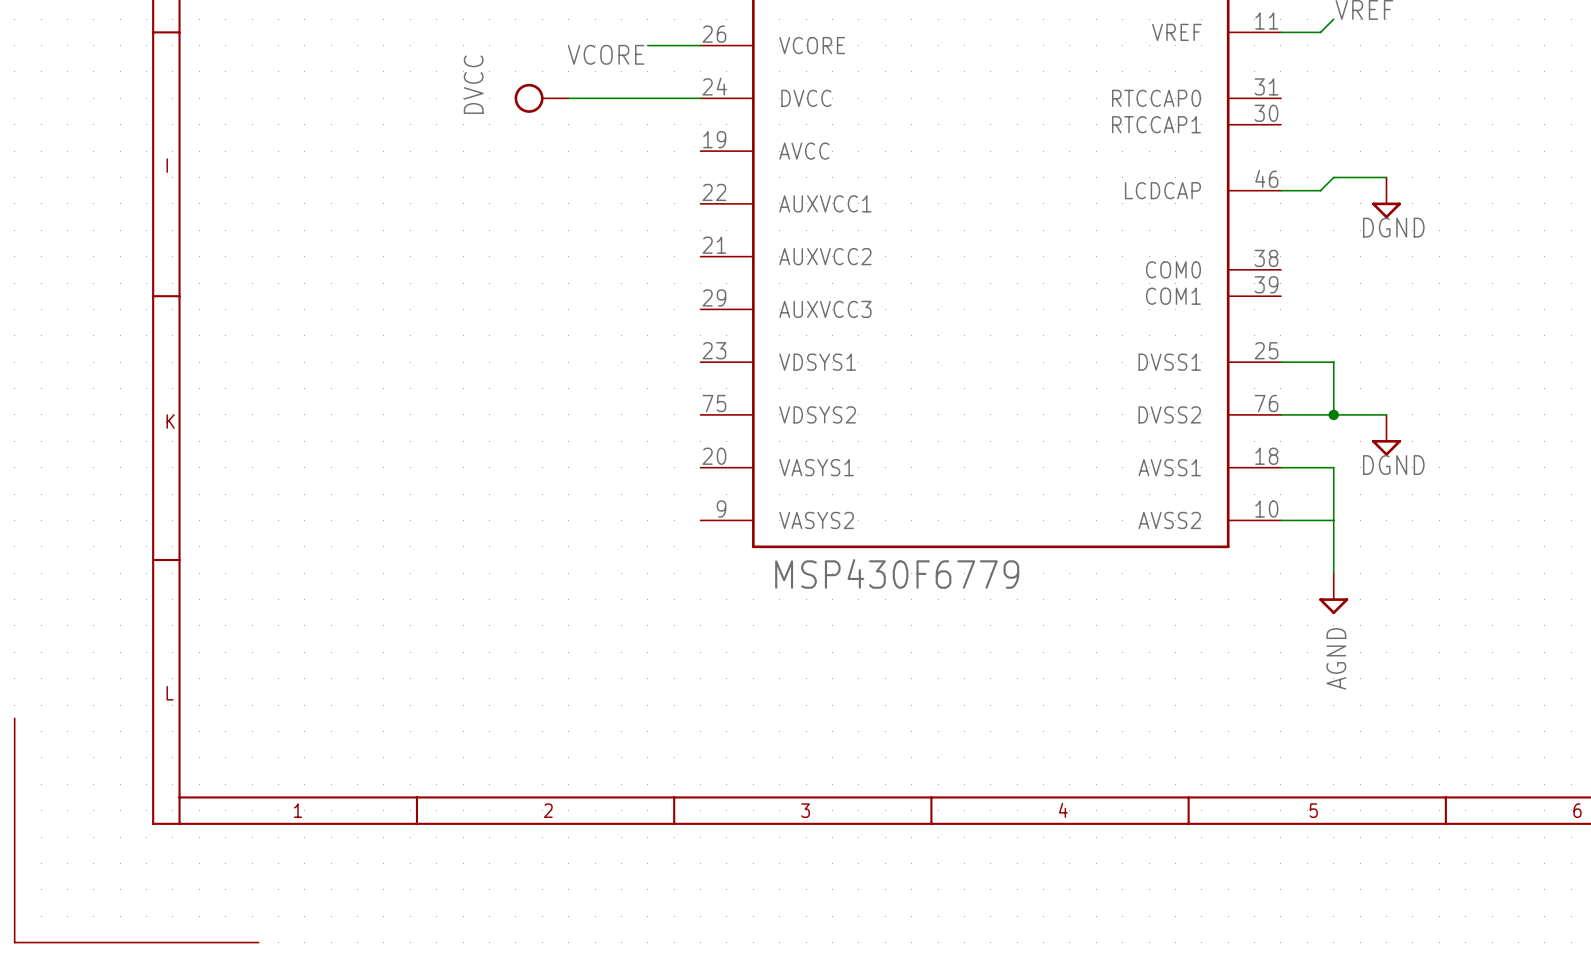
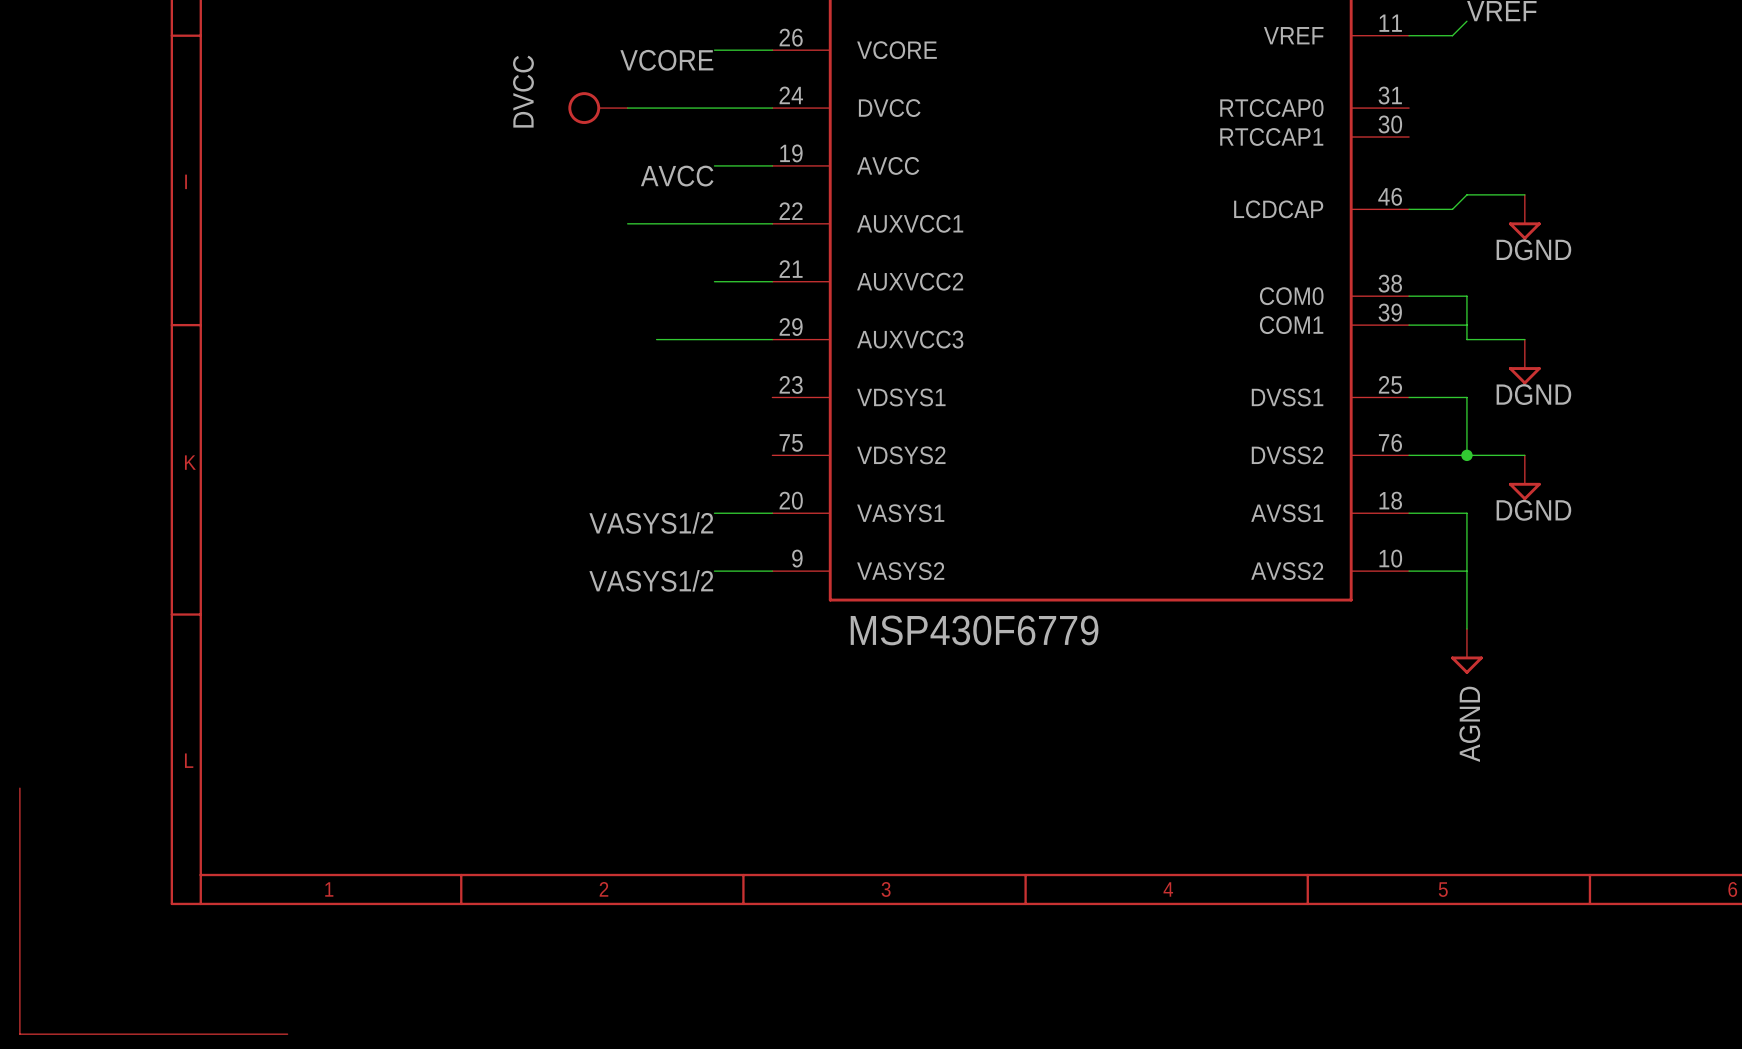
wire: none -> (714, 165) (772, 165)
label: none -> AVCC (677, 176)
wire: none -> (627, 223) (772, 223)
wire: none -> (714, 281) (772, 281)
wire: none -> (1409, 296) (1466, 296) (1466, 339) (1524, 339)
wire: none -> (1409, 325) (1466, 325)
wire: none -> (656, 339) (772, 339)
power symbol: none -> DGND (1524, 362)
wire: none -> (714, 513) (772, 513)
label: none -> VASYS1/2 (651, 522)
wire: none -> (714, 571) (772, 571)
label: none -> VASYS1/2 (651, 580)

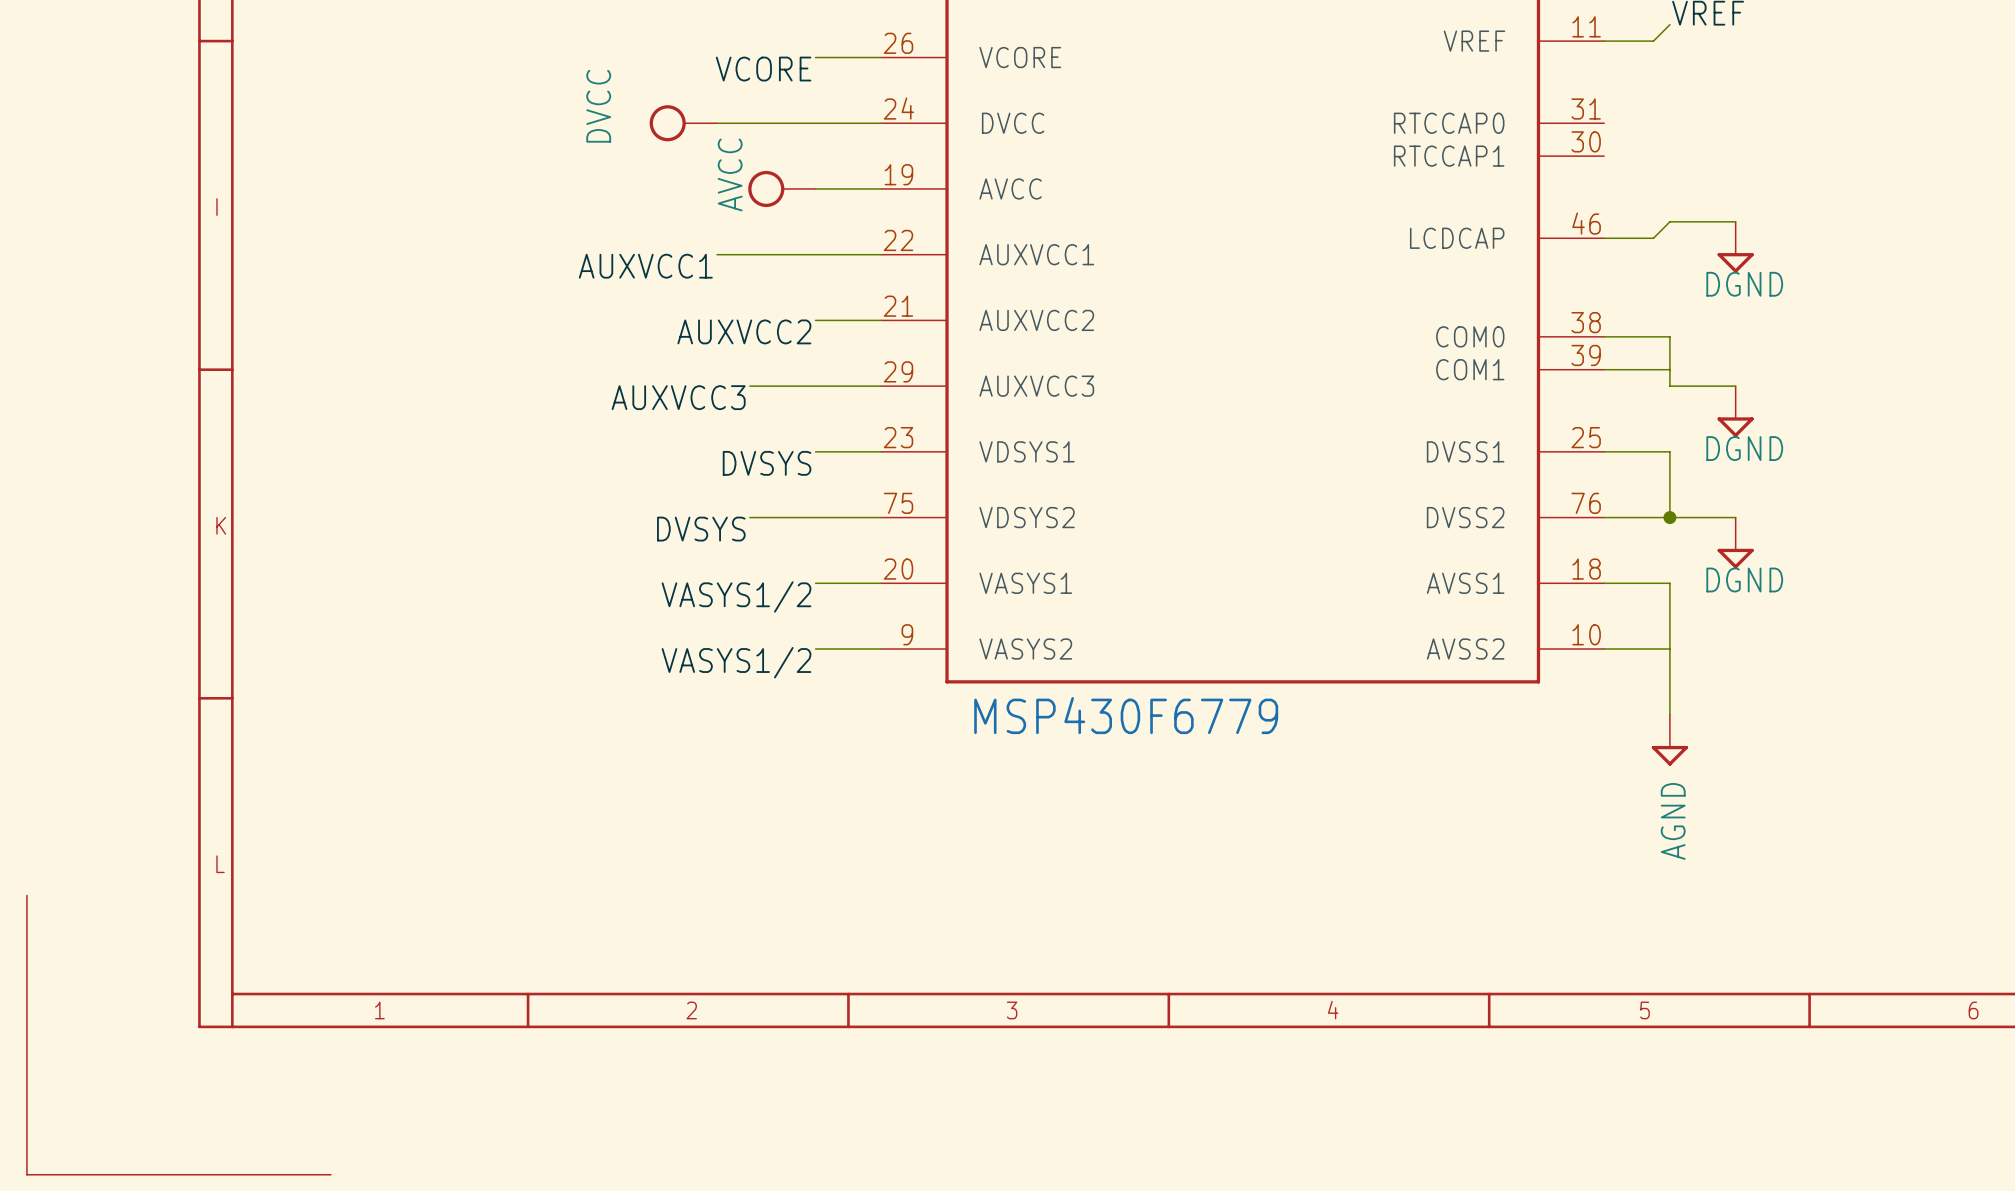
power symbol: none -> AVCC (781, 188)
label: AVCC (677, 176) -> none
label: none -> AUXVCC1 (645, 266)
label: none -> AUXVCC2 (744, 331)
label: none -> AUXVCC3 (678, 397)
wire: none -> (815, 451) (881, 451)
label: none -> DVSYS (767, 463)
wire: none -> (749, 517) (881, 517)
label: none -> DVSYS (701, 529)

